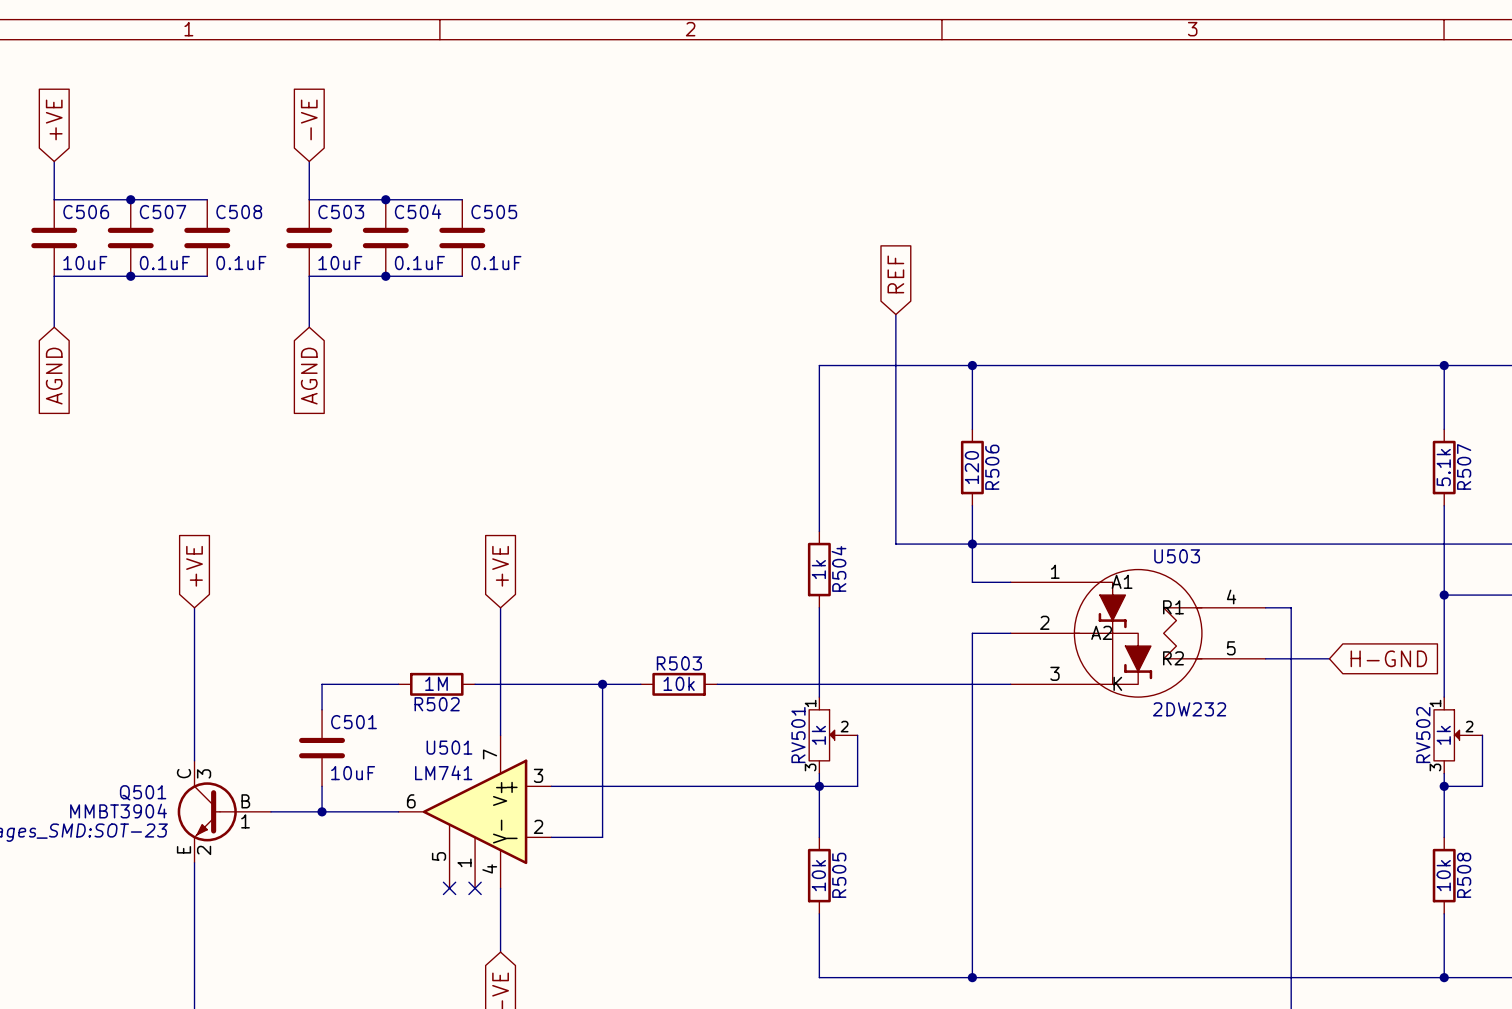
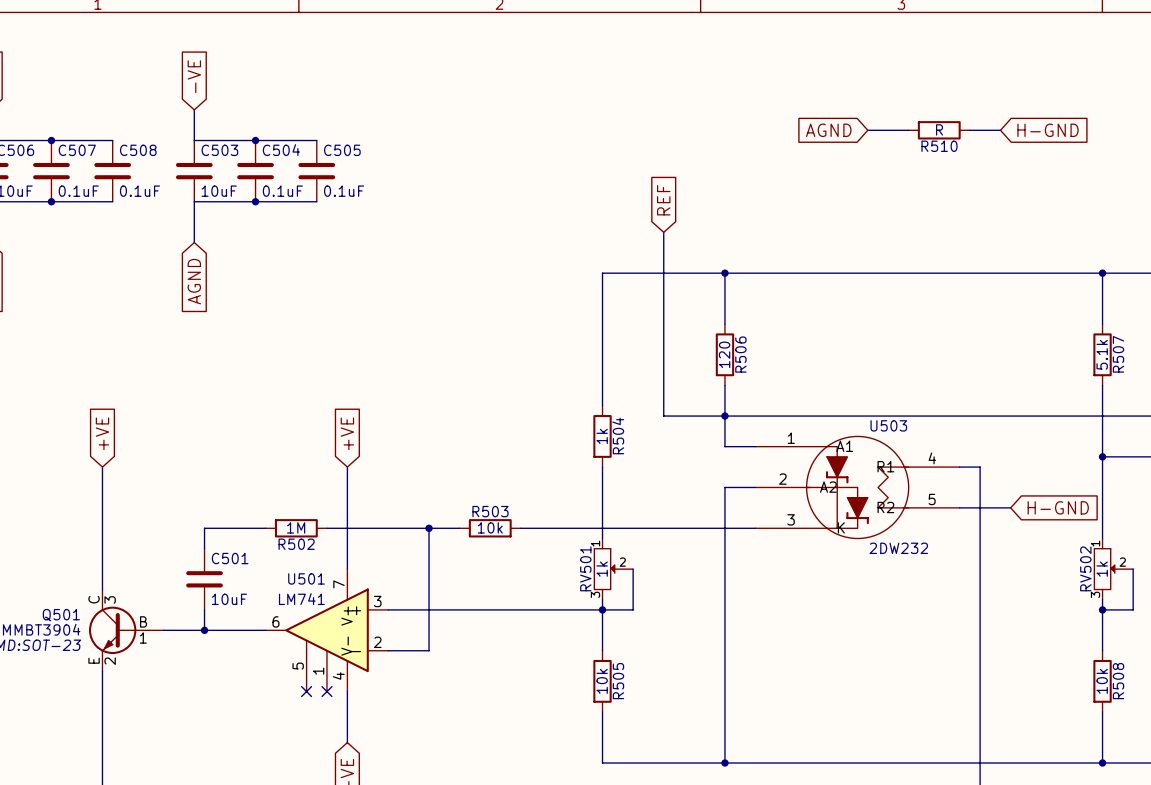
global label: none -> AGND (828, 130)
wire: none -> (867, 130) (908, 130)
R510: none -> R (939, 130)
wire: none -> (969, 130) (1000, 130)
global label: none -> H-GND (1048, 130)

